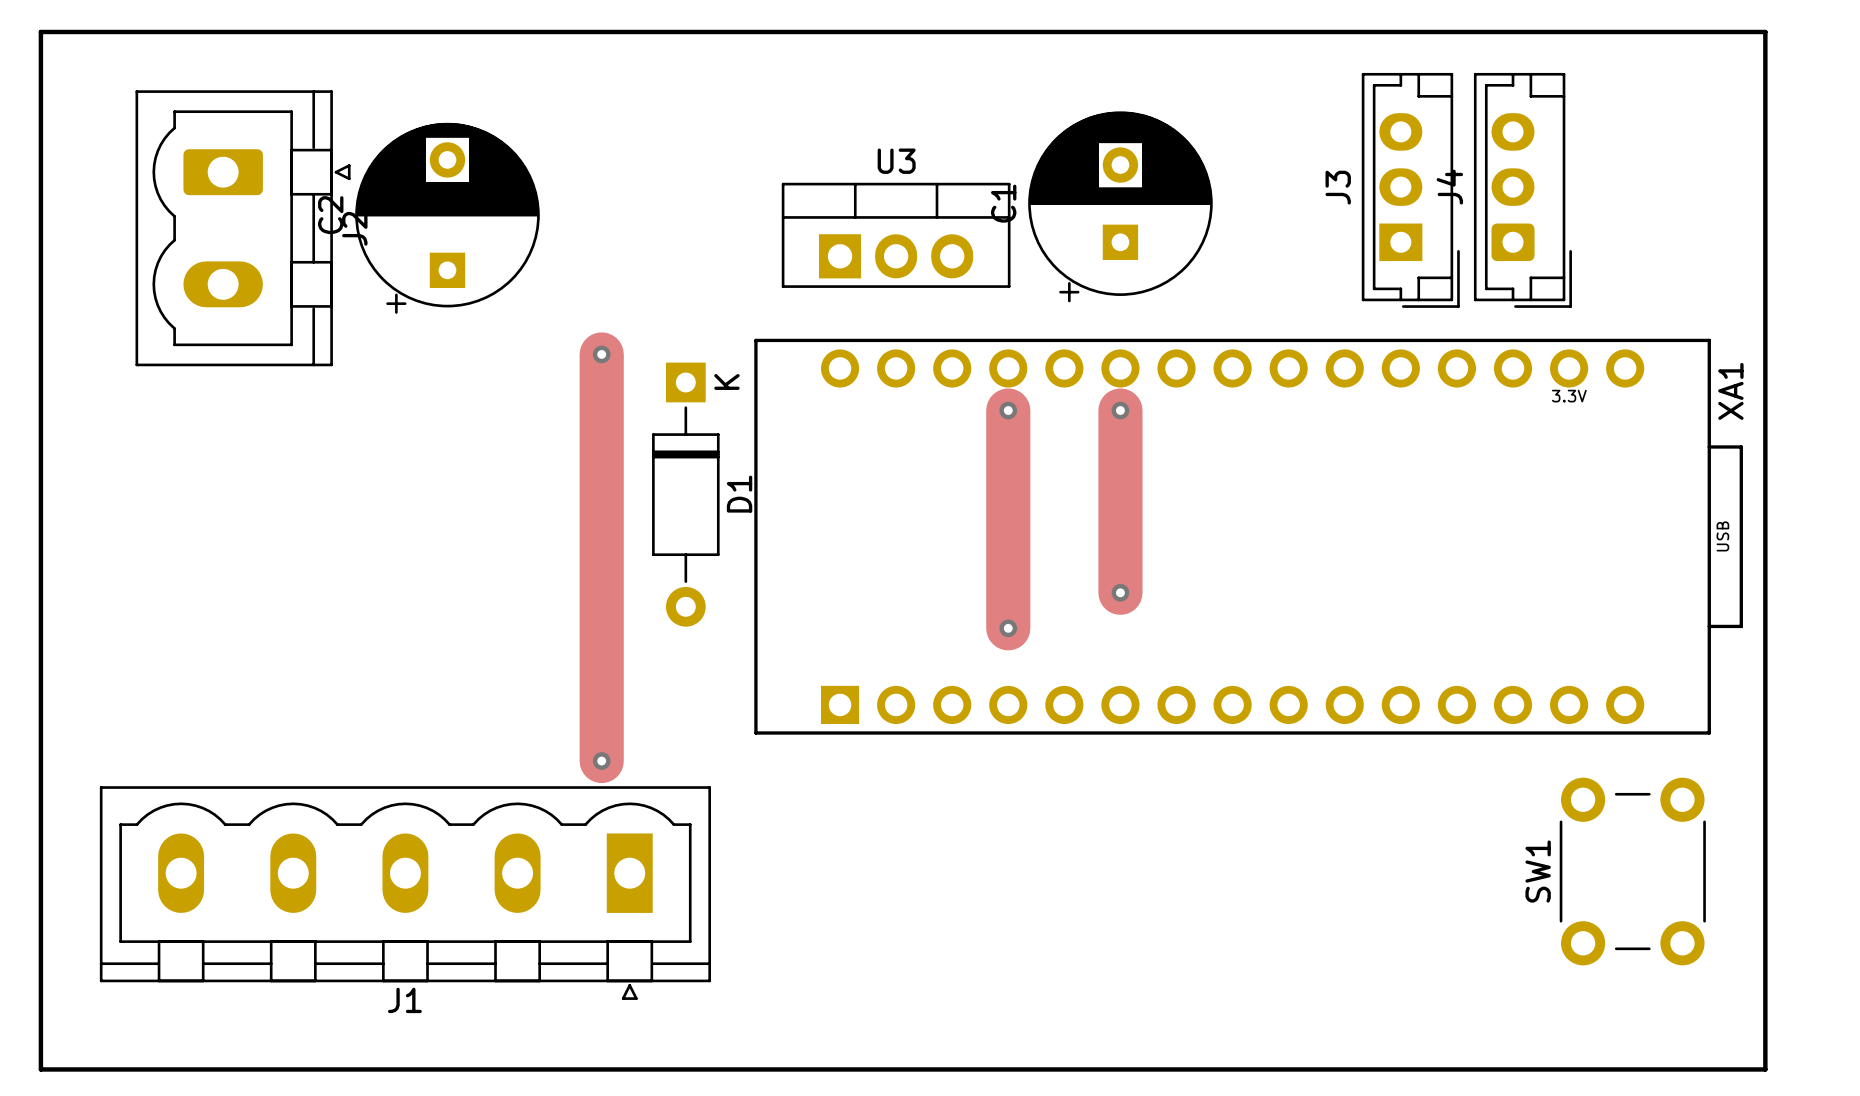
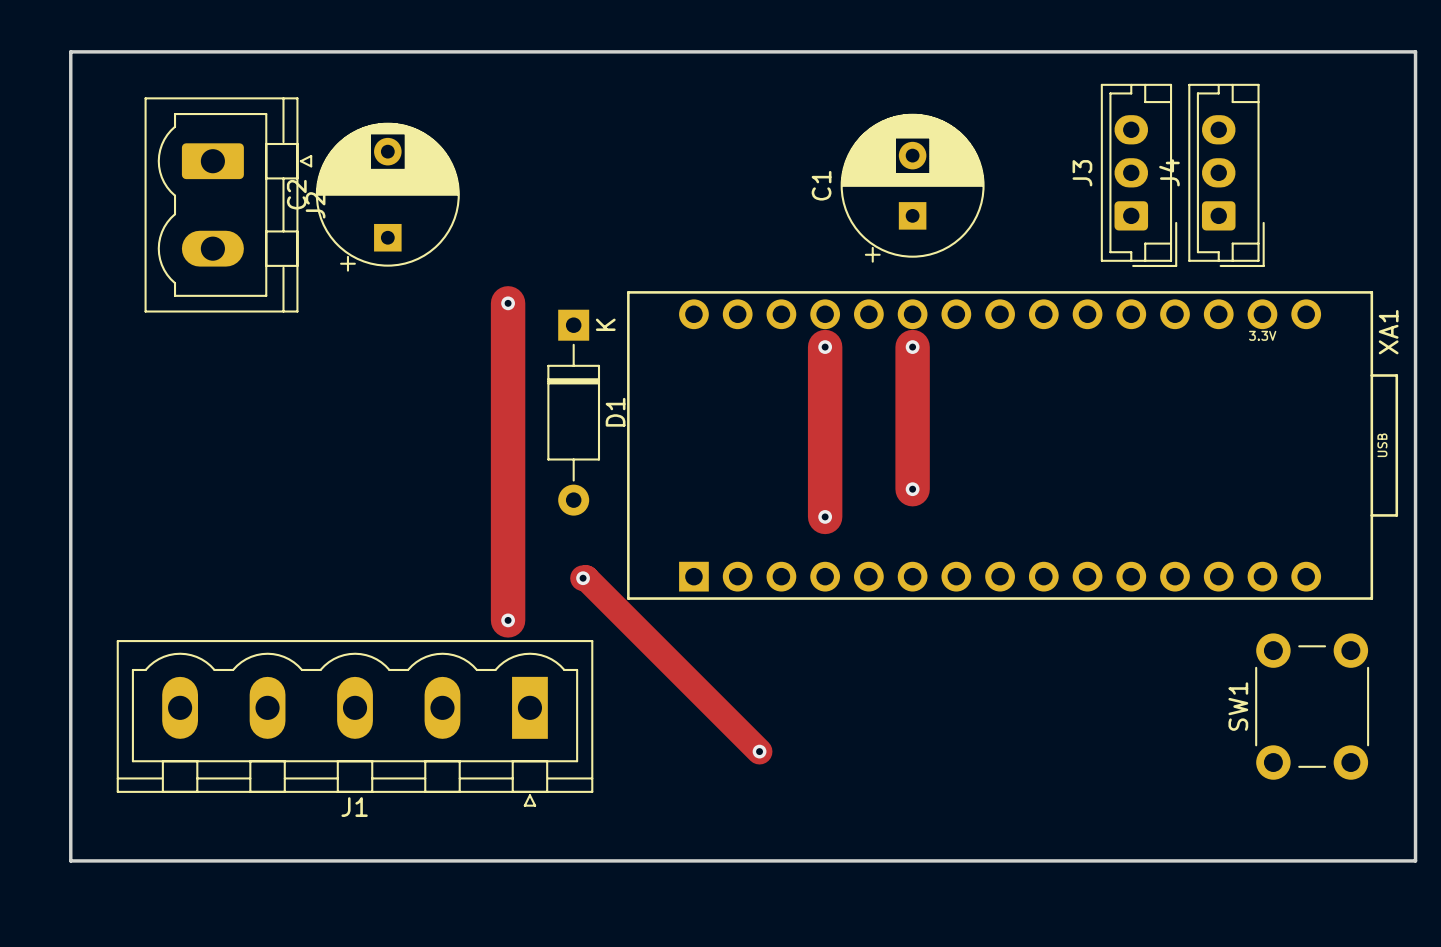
J3 footprint: [1361, 72, 1460, 308] -> [1100, 83, 1178, 268]
U3: (896, 235) -> none
track: none -> (583, 578) (586, 578) (759, 751)
via: none -> (583, 578)
via: none -> (759, 751)

